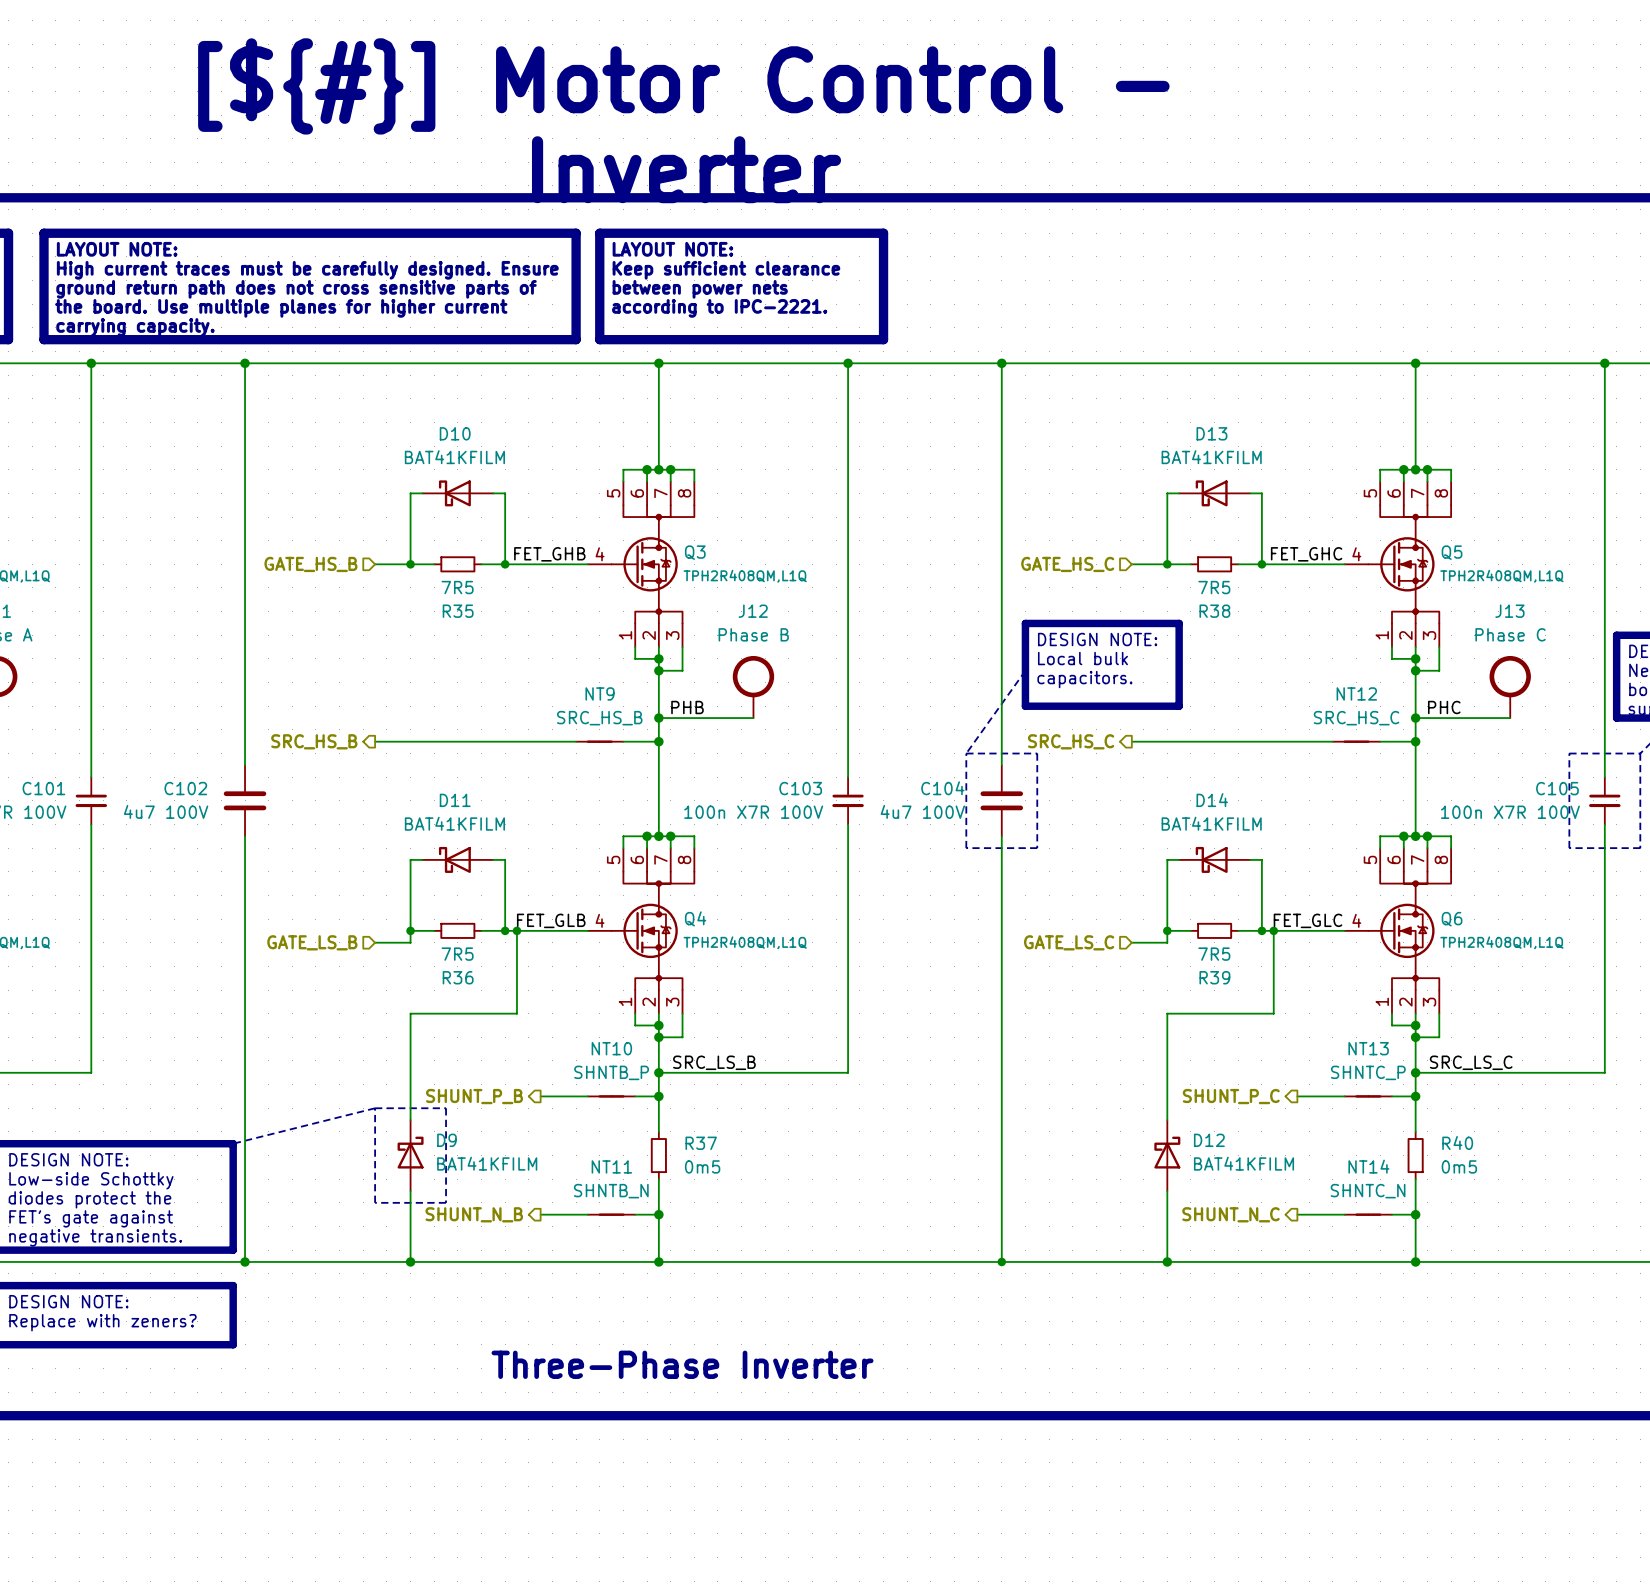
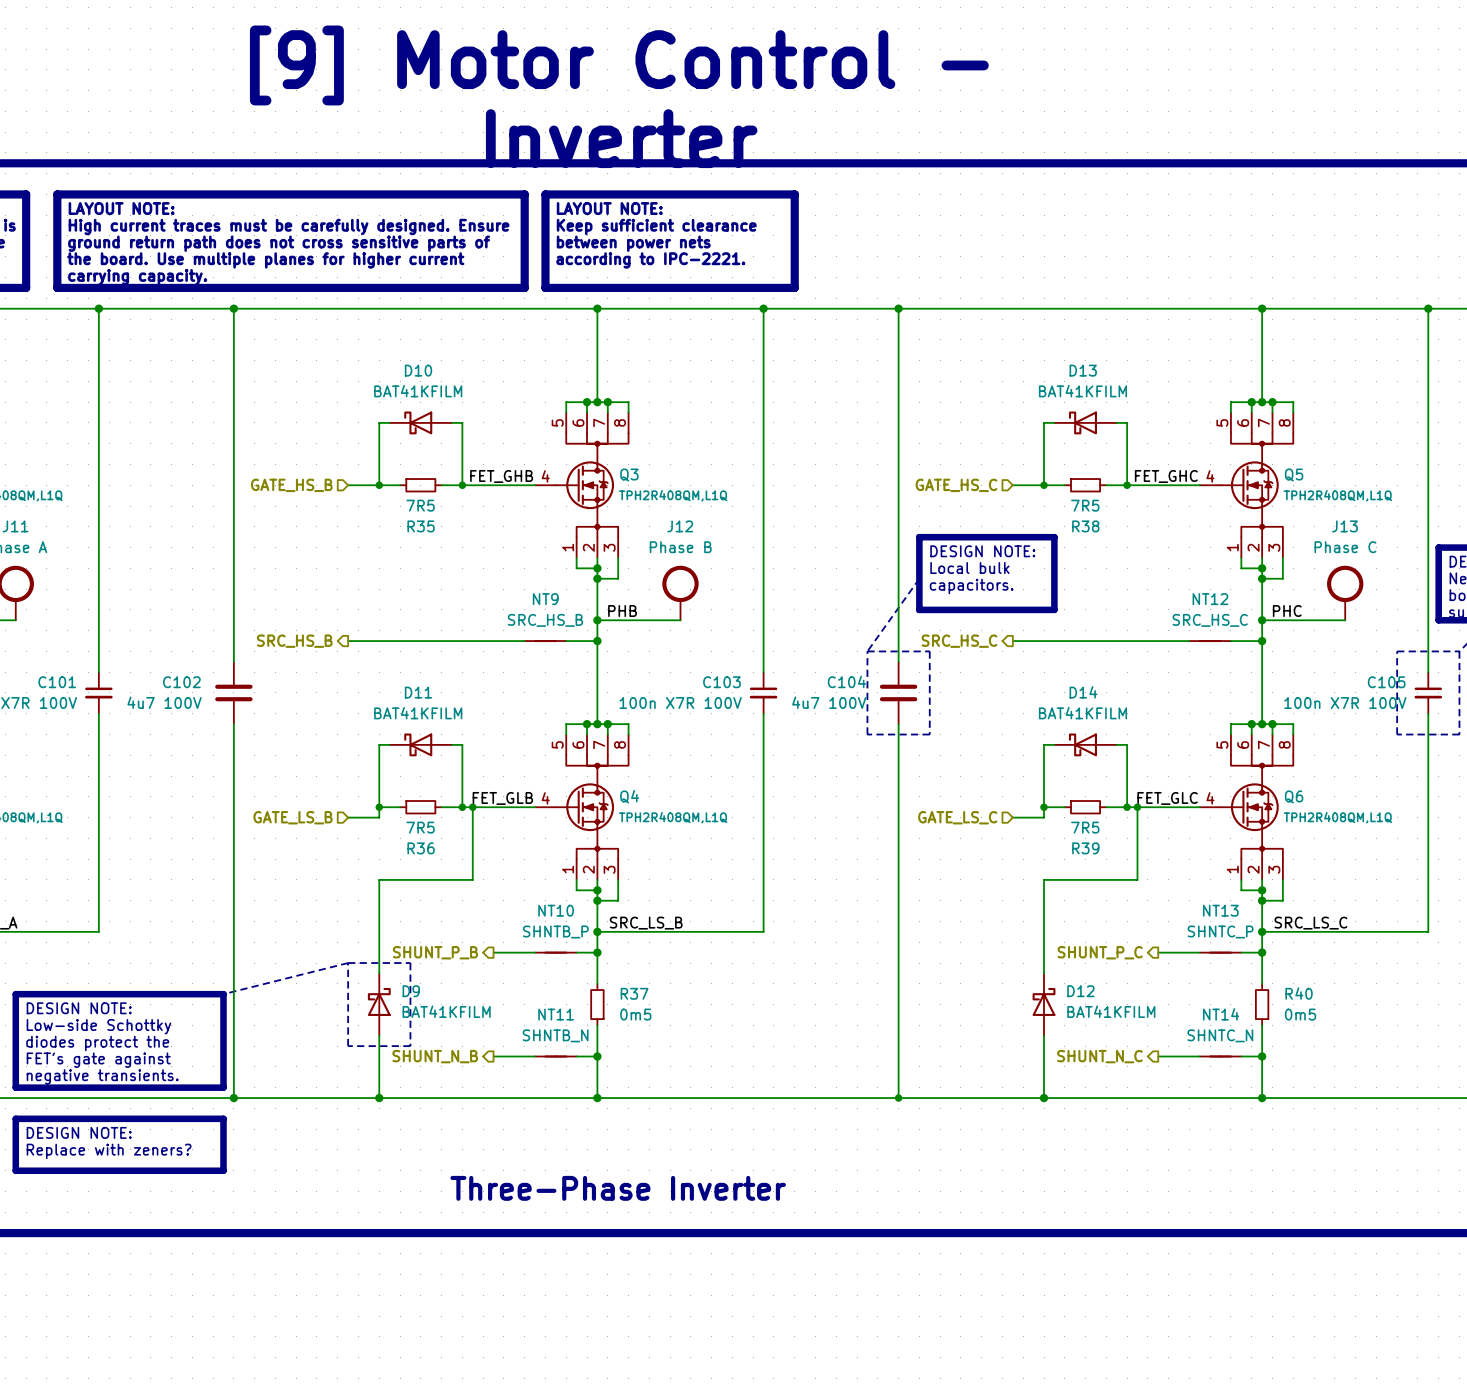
text: [${#}] Motor Control - (683, 86) -> [9] Motor Control - (619, 65)

